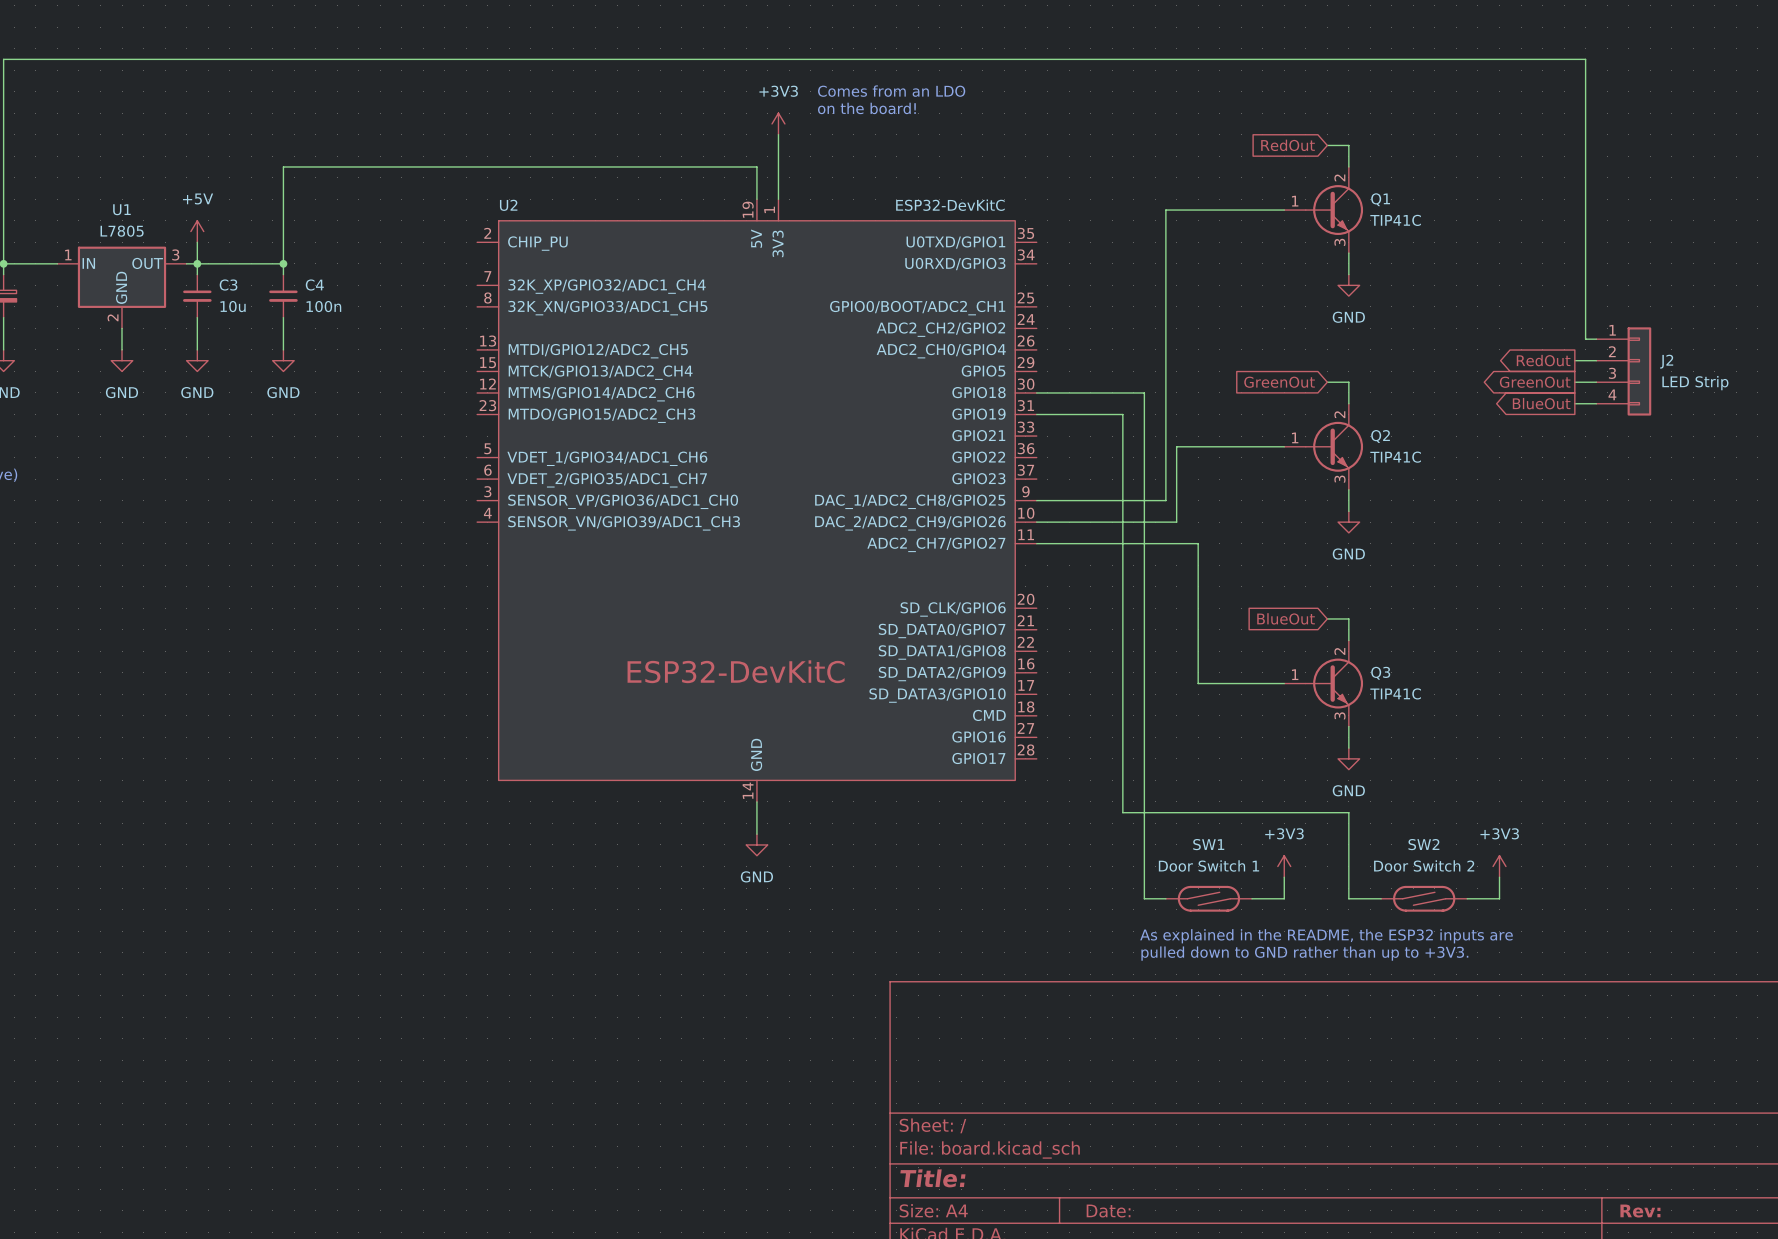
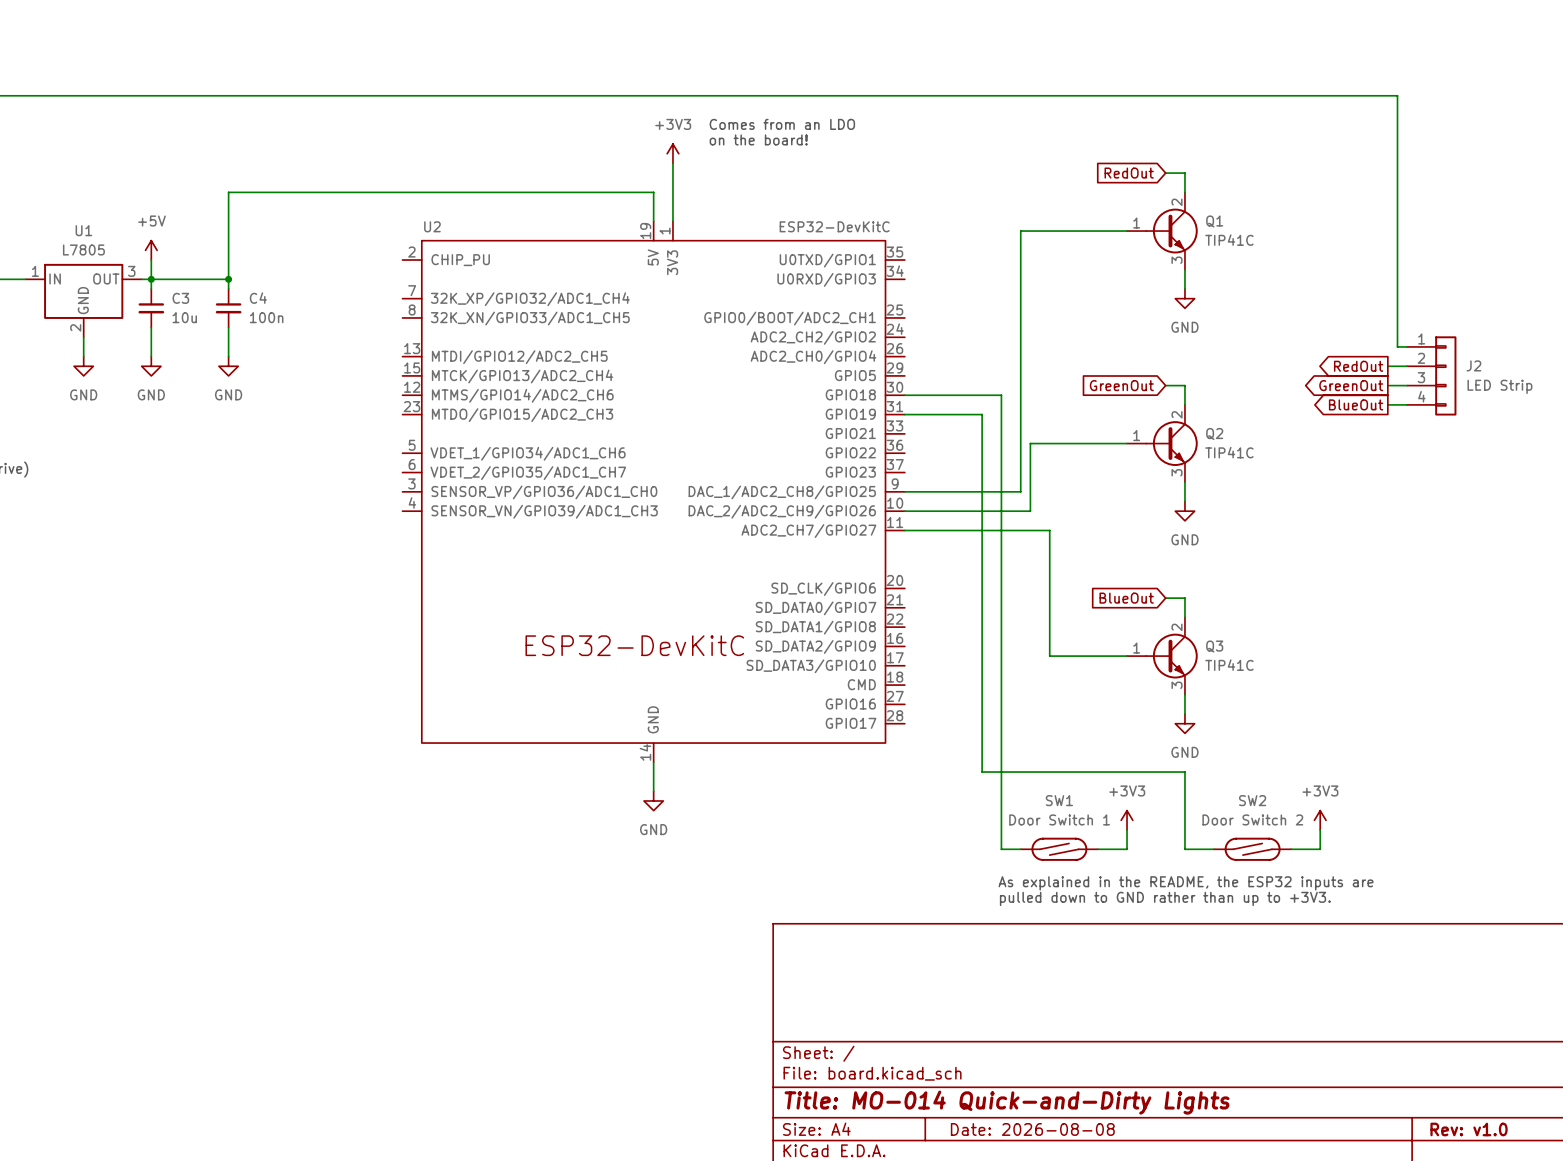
title block: Title: (932, 1178) -> Title: MO-014 Quick-and-Dirty Lights (1007, 1102)
title block: Date: (1108, 1211) -> Date: 2026-08-08 (1032, 1129)
title block: Rev: (1640, 1211) -> Rev: v1.0 (1469, 1129)

